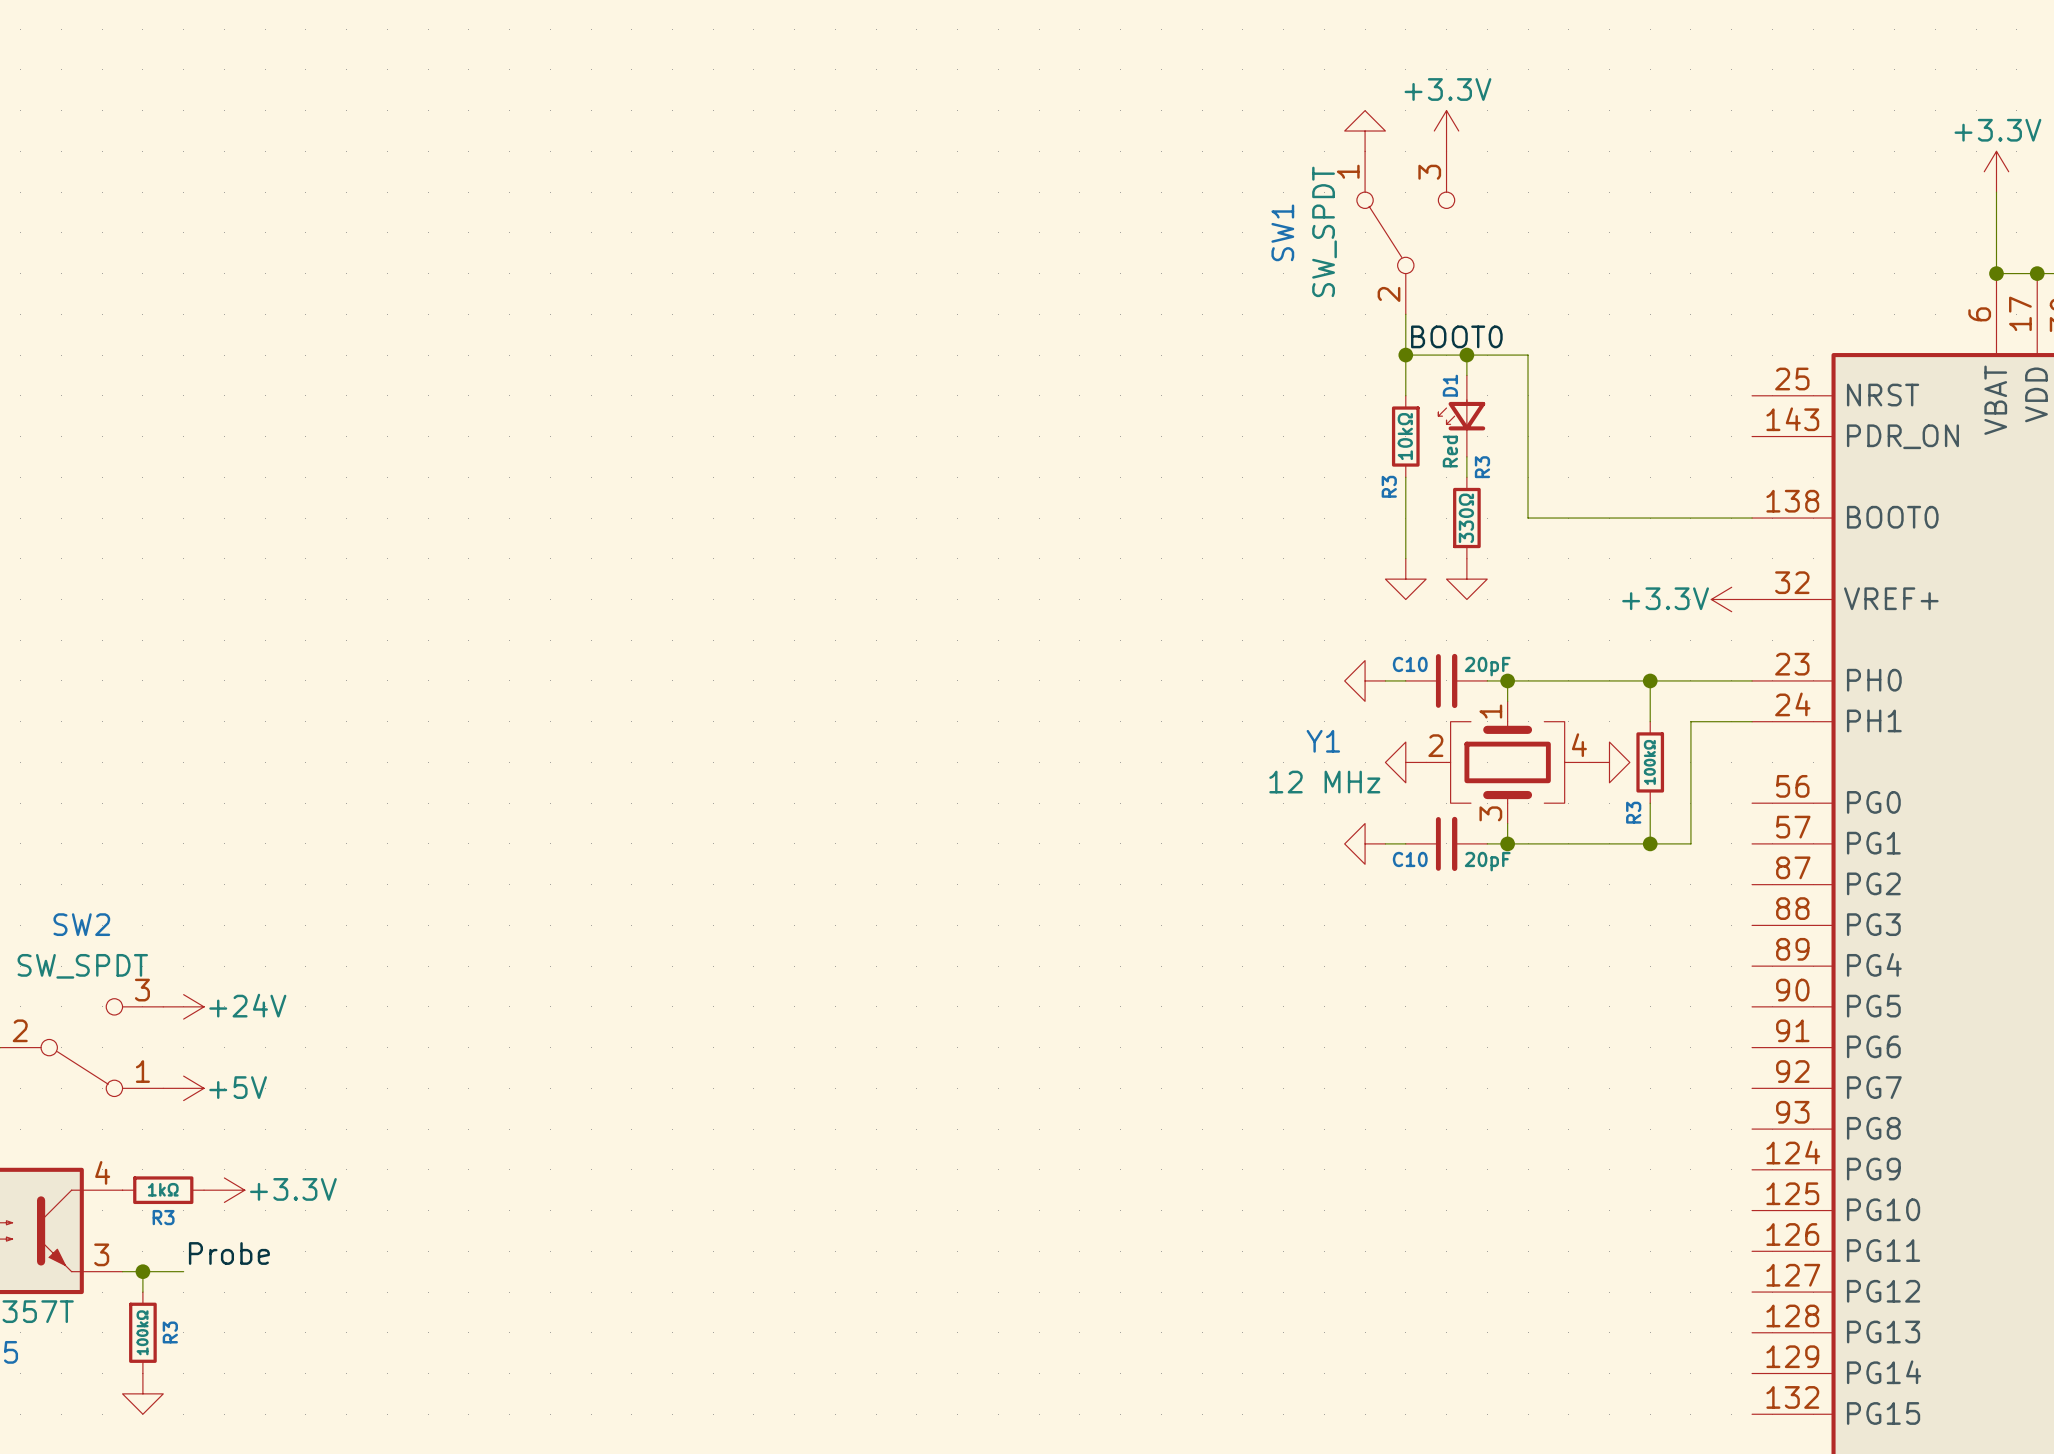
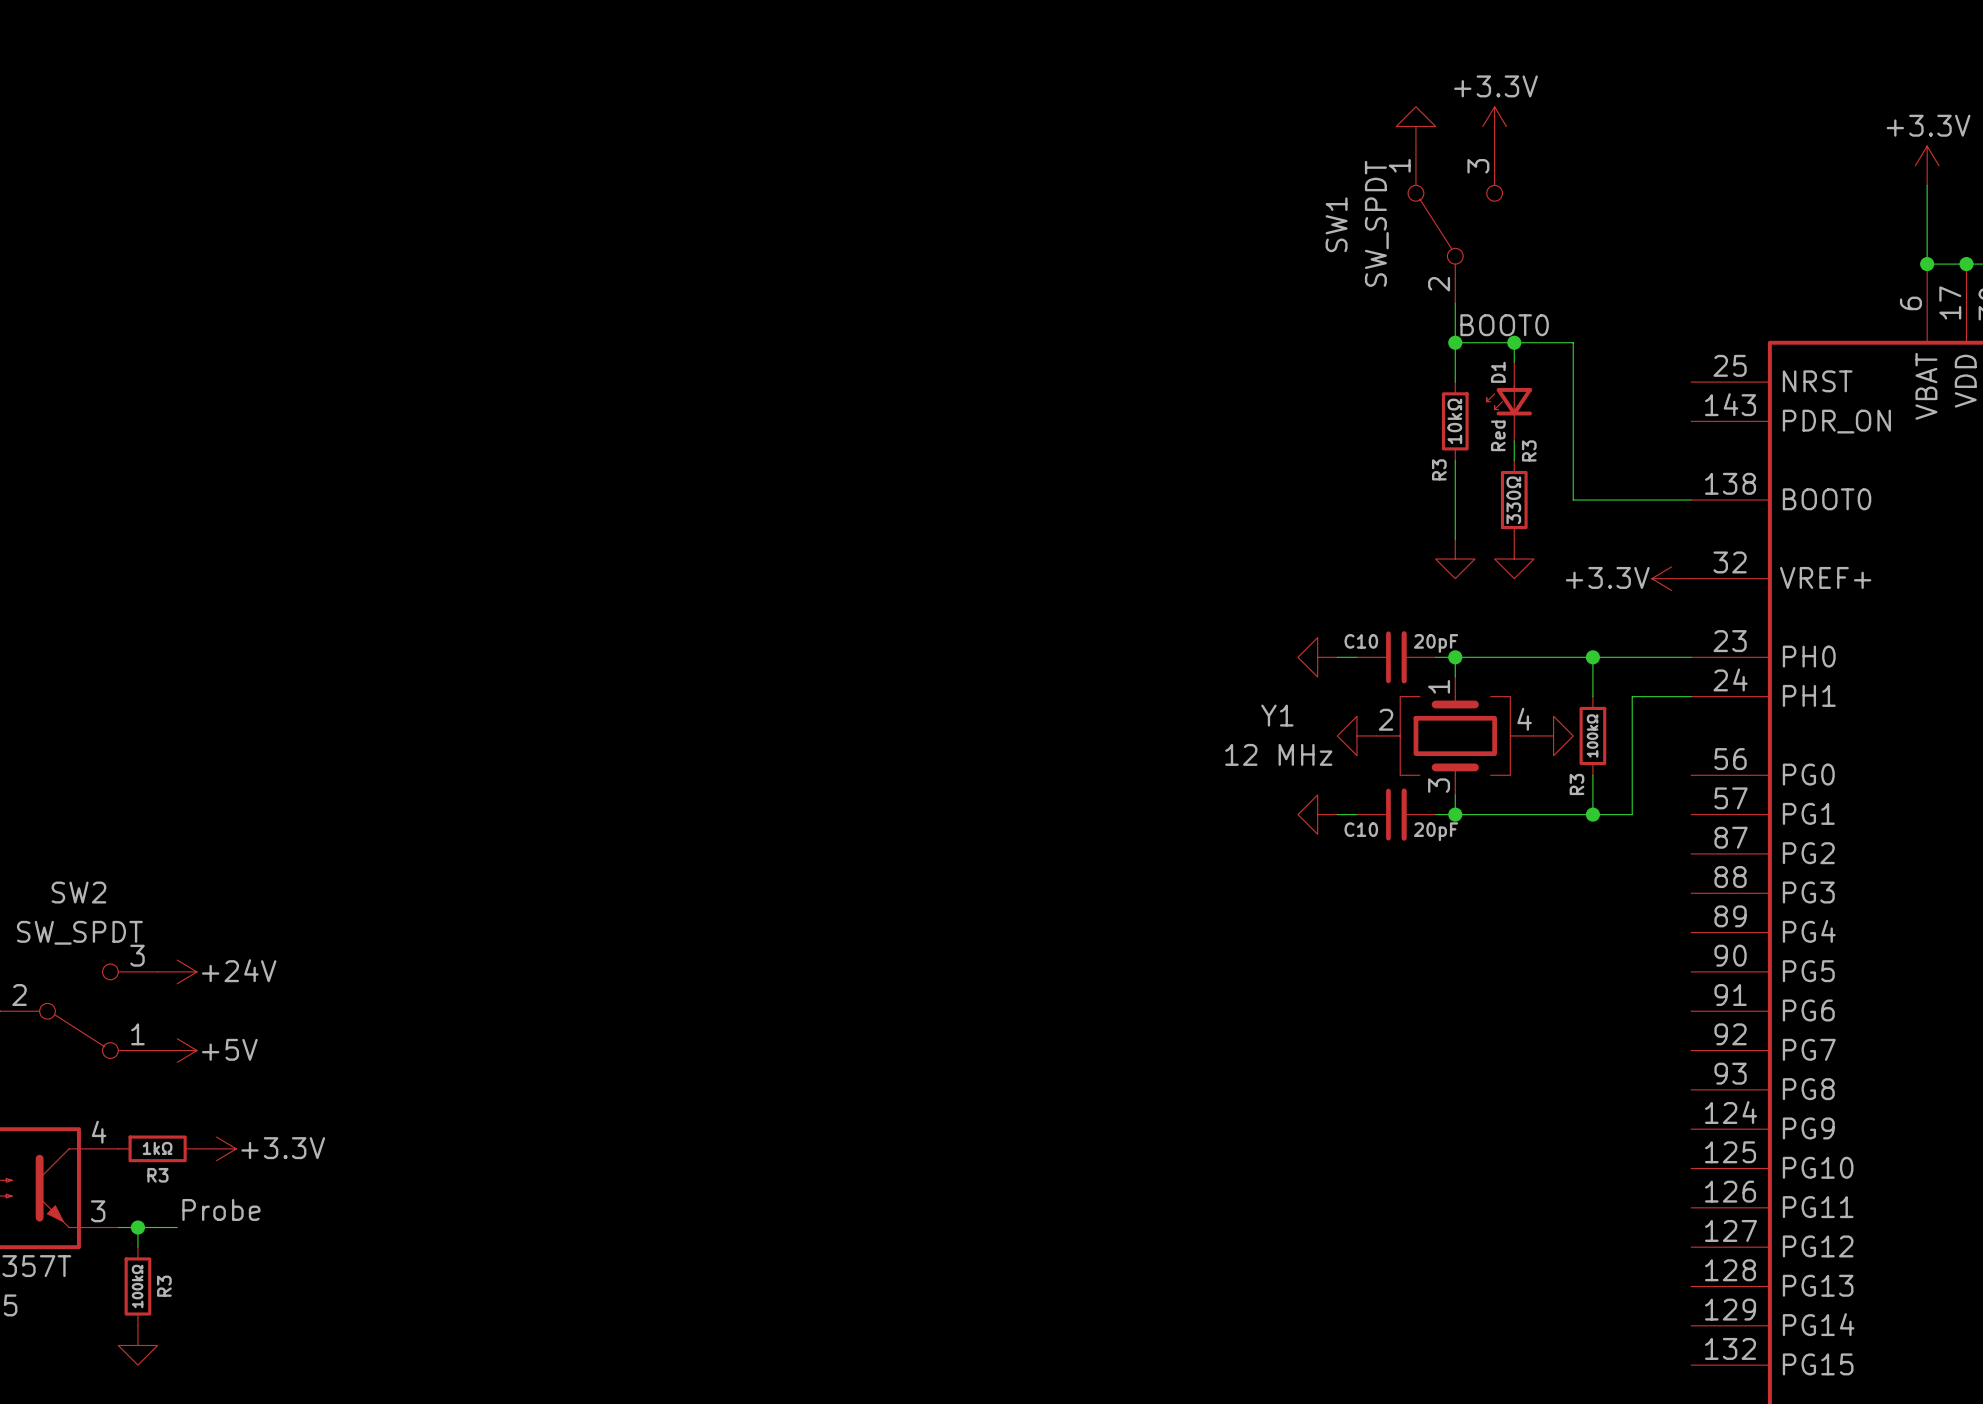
power symbol position: (1365, 131) -> (1415, 126)
power symbol position: +3.3V (1446, 131) -> +3.3V (1494, 126)
SW1 position: (1405, 232) -> (1455, 224)
wire: (1405, 314) (1405, 395) -> (1455, 303) (1455, 382)
label position: BOOT0 (1456, 336) -> BOOT0 (1504, 325)
wire: (1405, 355) (1507, 355) -> none
junction: (1405, 355) -> none
wire: (1466, 355) (1466, 375) -> (1514, 342) (1514, 362)
junction position: (1466, 355) -> (1455, 342)
wire: (1528, 355) (1528, 518) (1629, 518) -> (1474, 342) (1573, 342) (1573, 500)
junction: none -> (1514, 342)
D1 position: (1461, 416) -> (1509, 401)
R3 position: (1405, 436) -> (1455, 421)
wire: (1466, 456) (1466, 477) -> (1514, 441) (1514, 460)
wire: (1405, 477) (1405, 558) -> (1455, 460) (1455, 539)
R3 position: (1466, 518) -> (1514, 500)
power symbol: (1405, 579) -> none
power symbol position: (1466, 579) -> (1455, 559)
power symbol: none -> (1514, 559)

